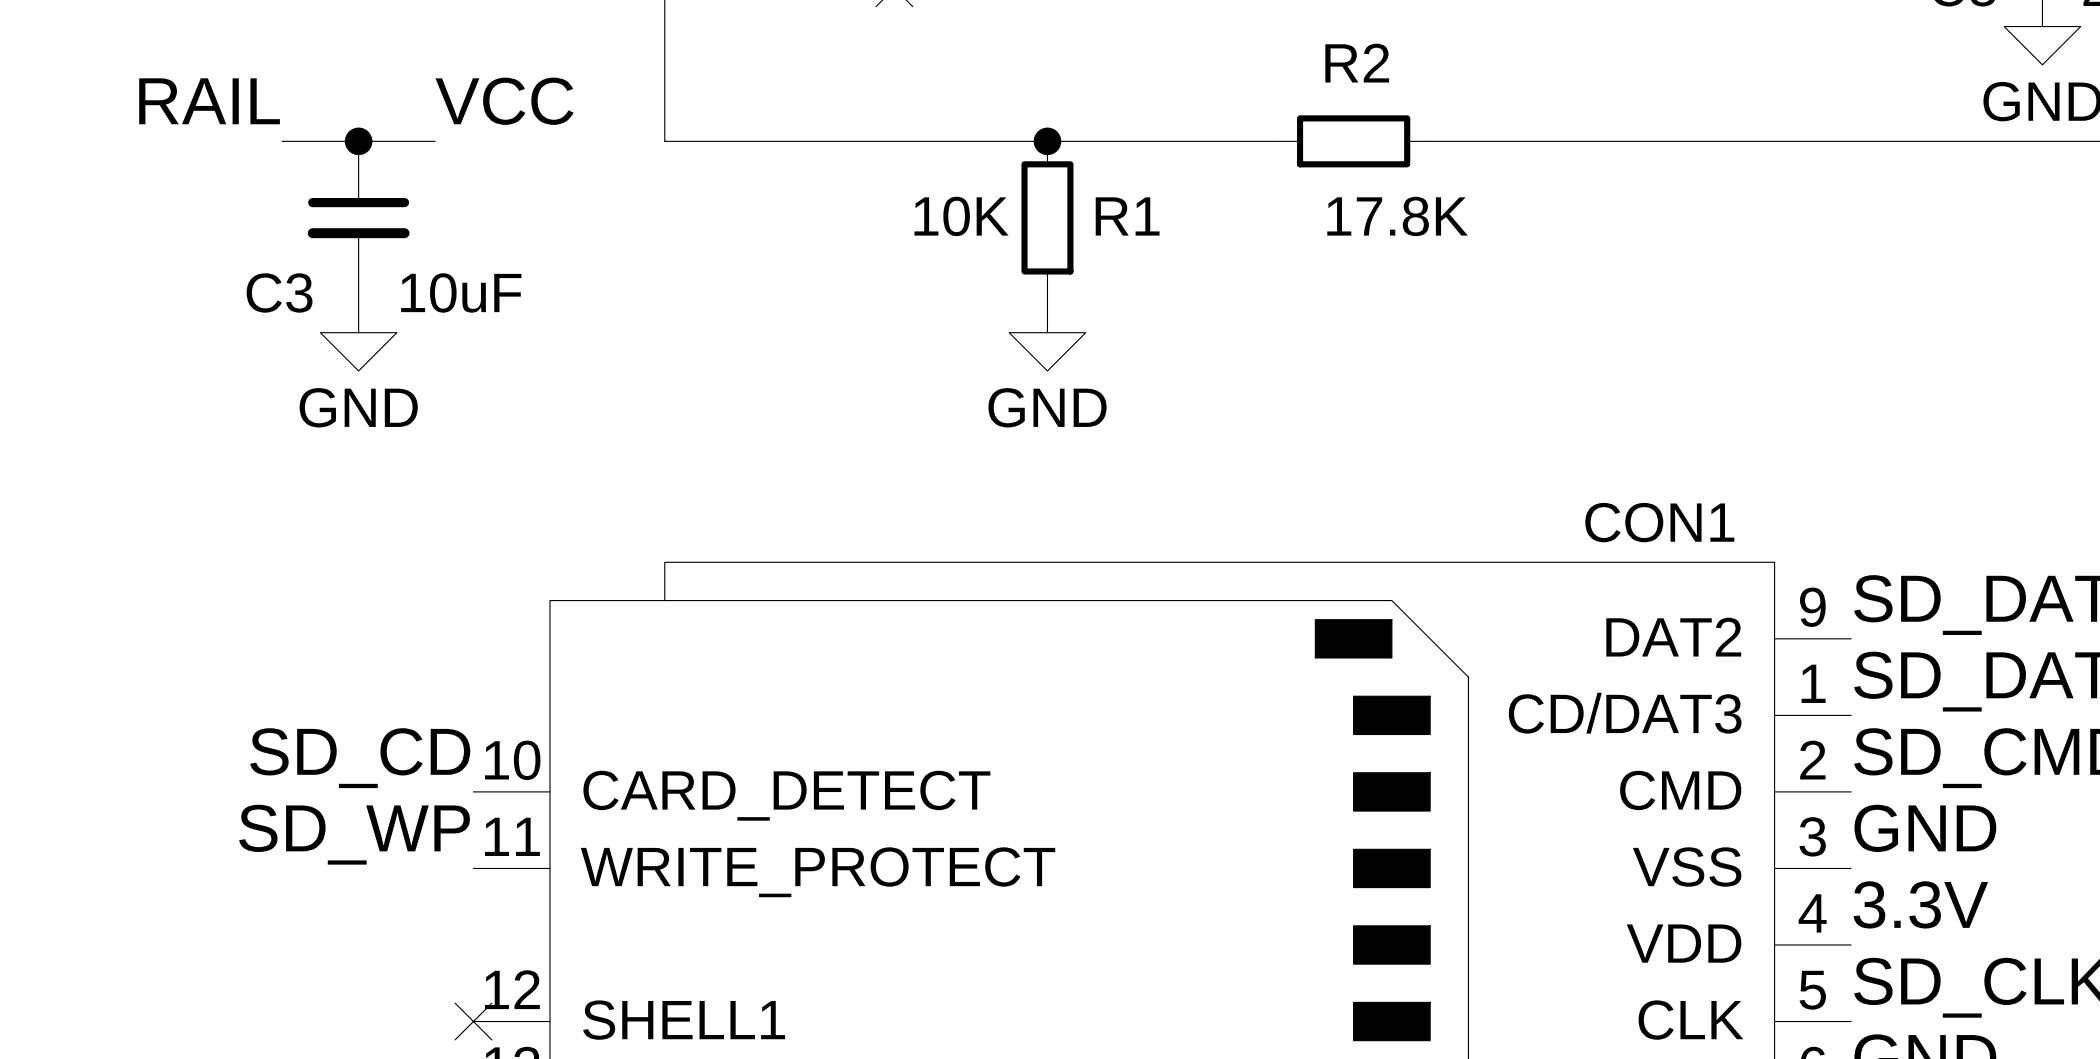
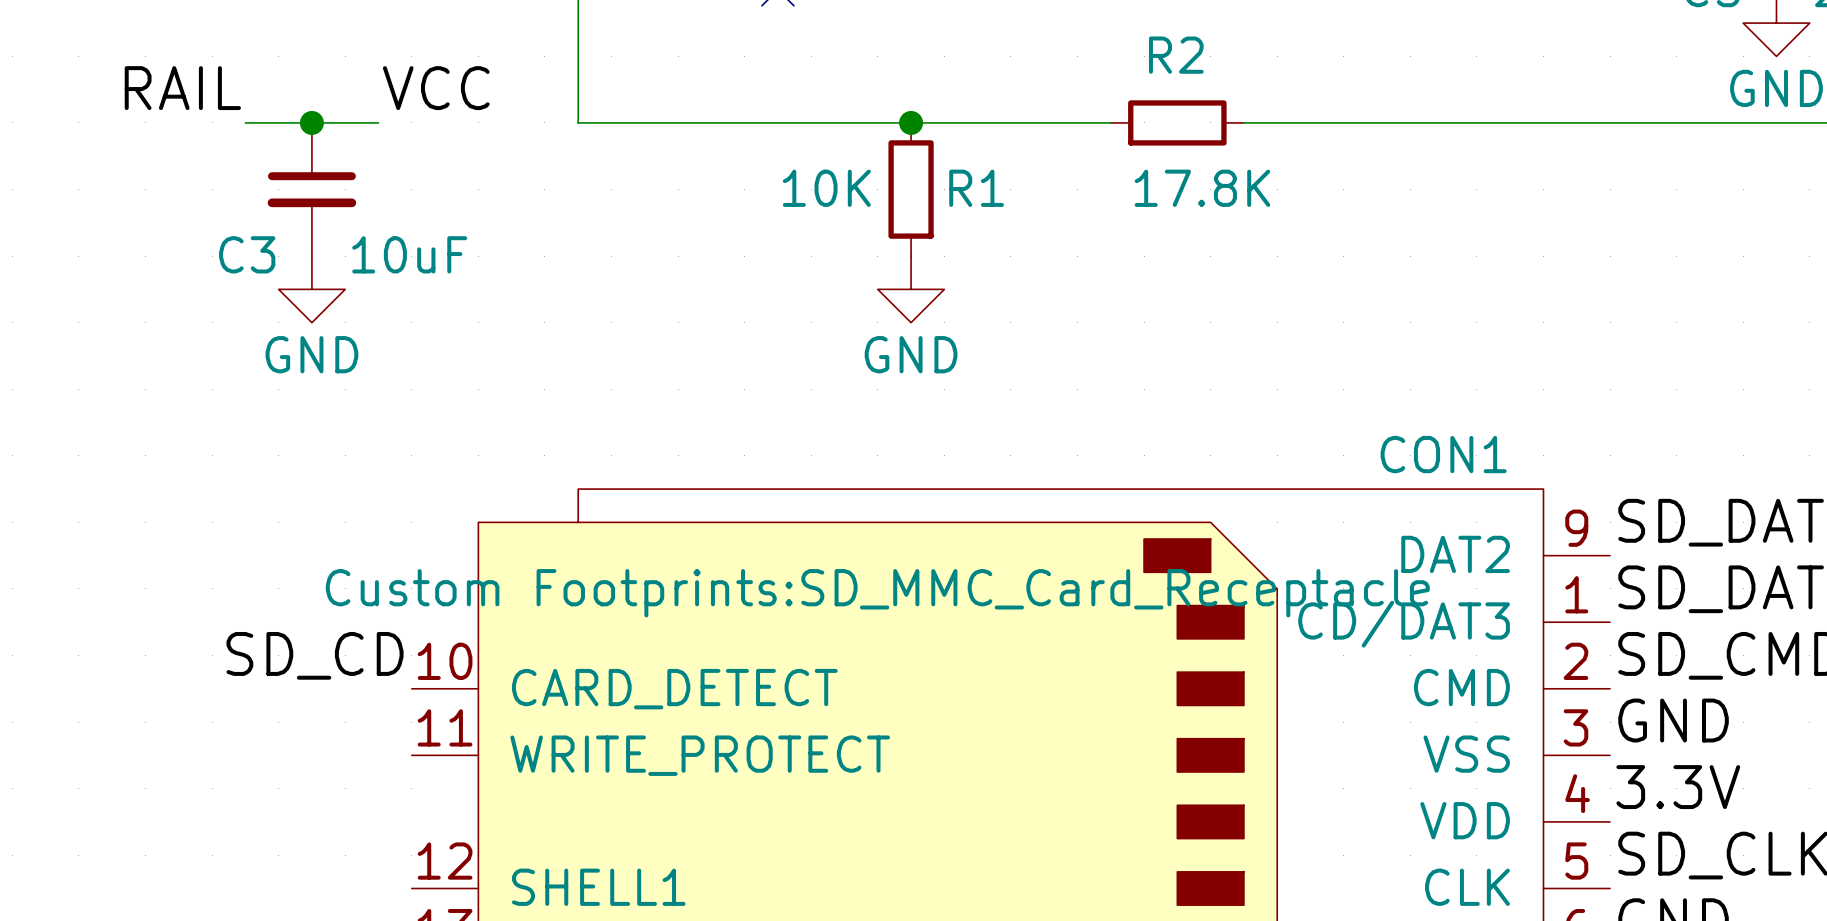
CON1 text: none -> Custom Footprints:SD_MMC_Card_Receptacle (877, 593)
label: SD_WP (354, 834) -> none
no-connect mark: (473, 1021) -> none

